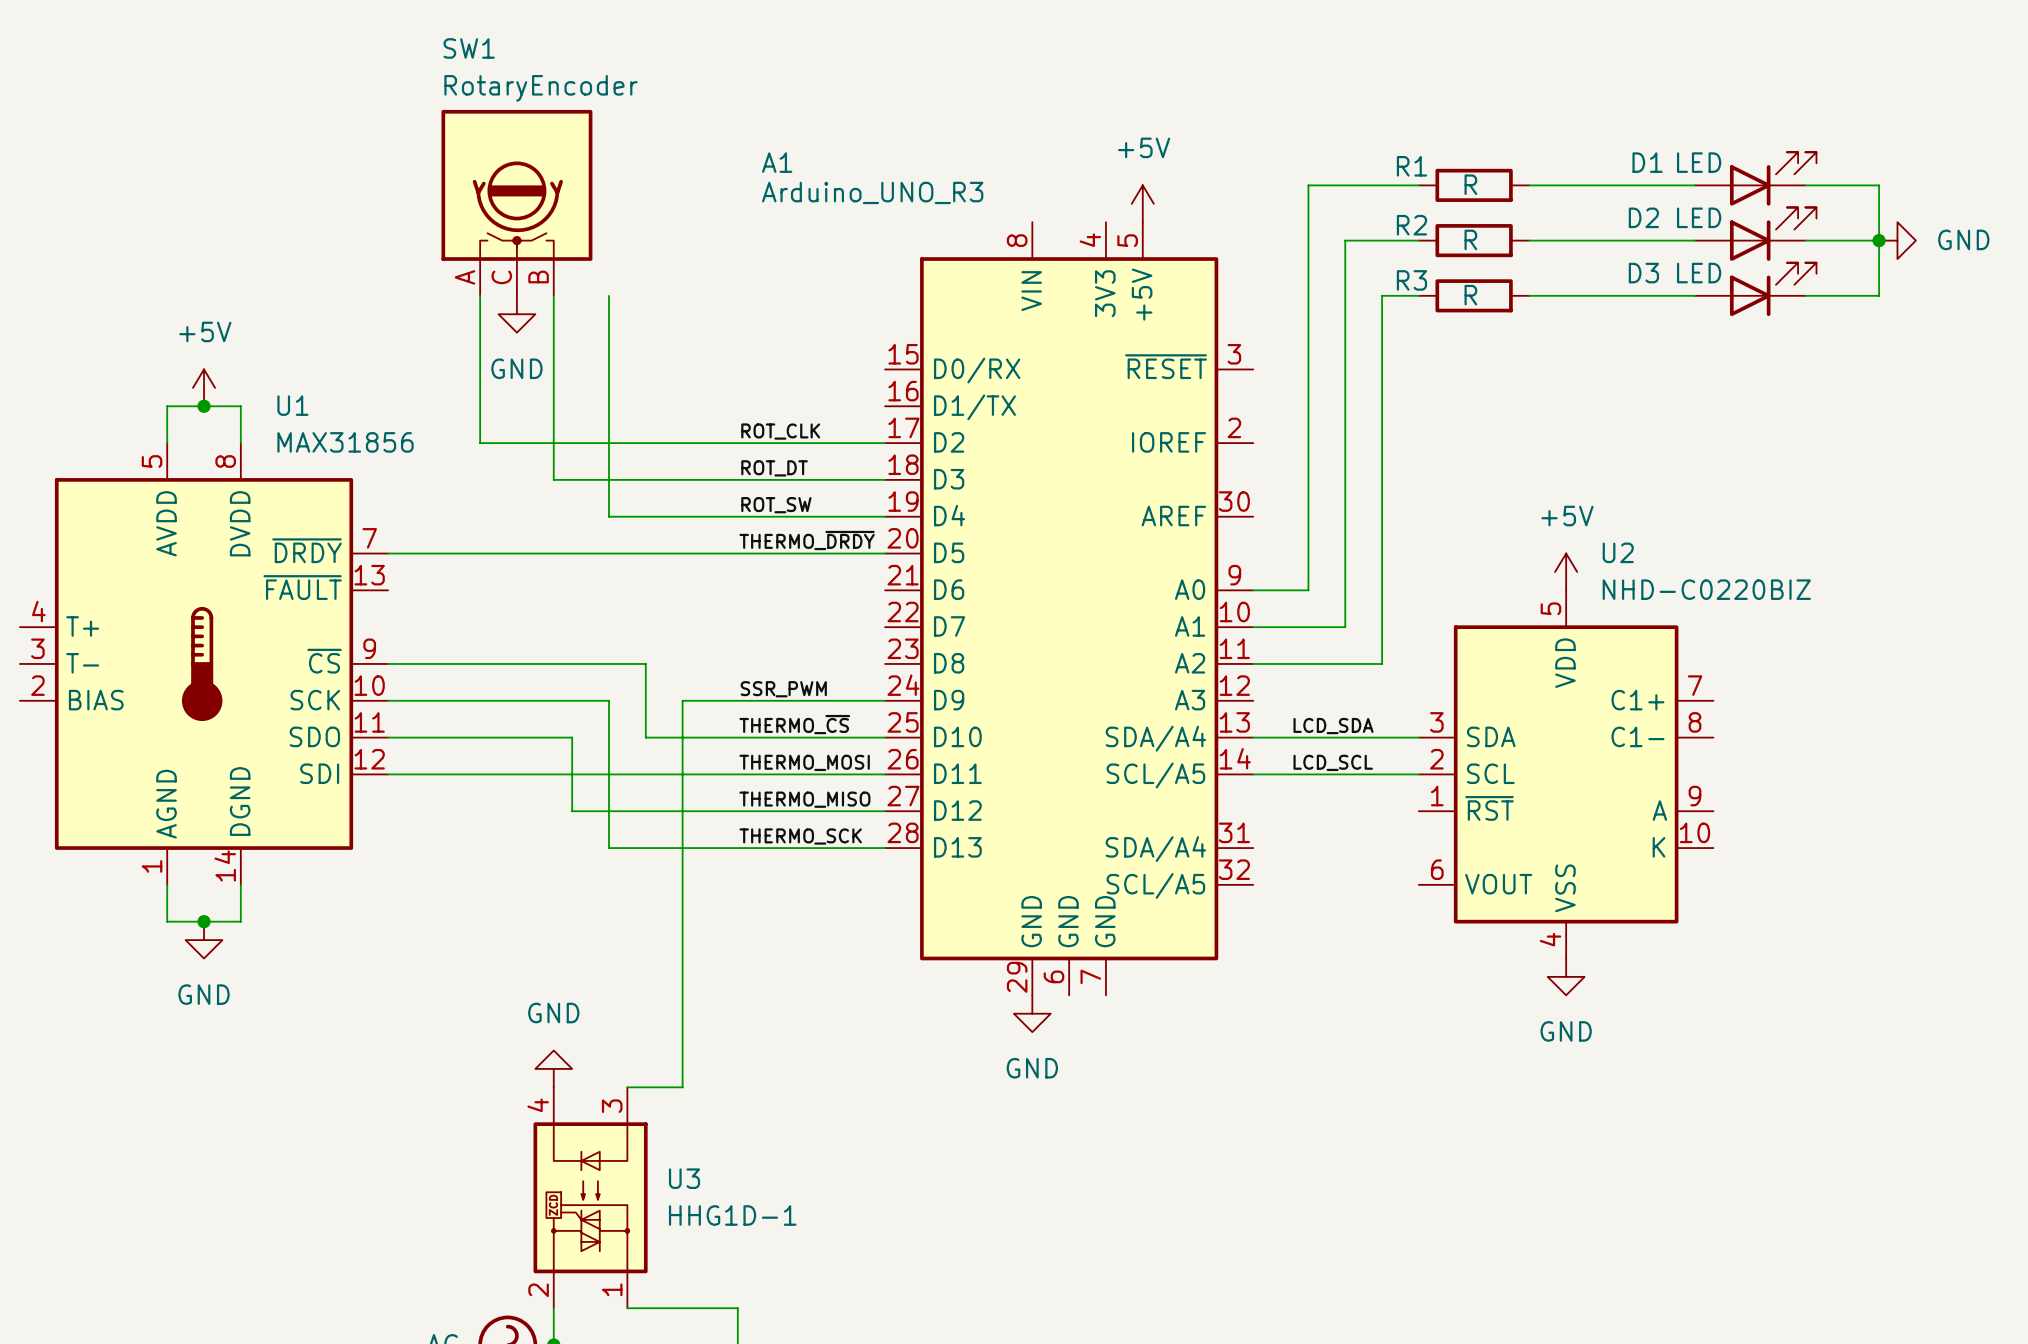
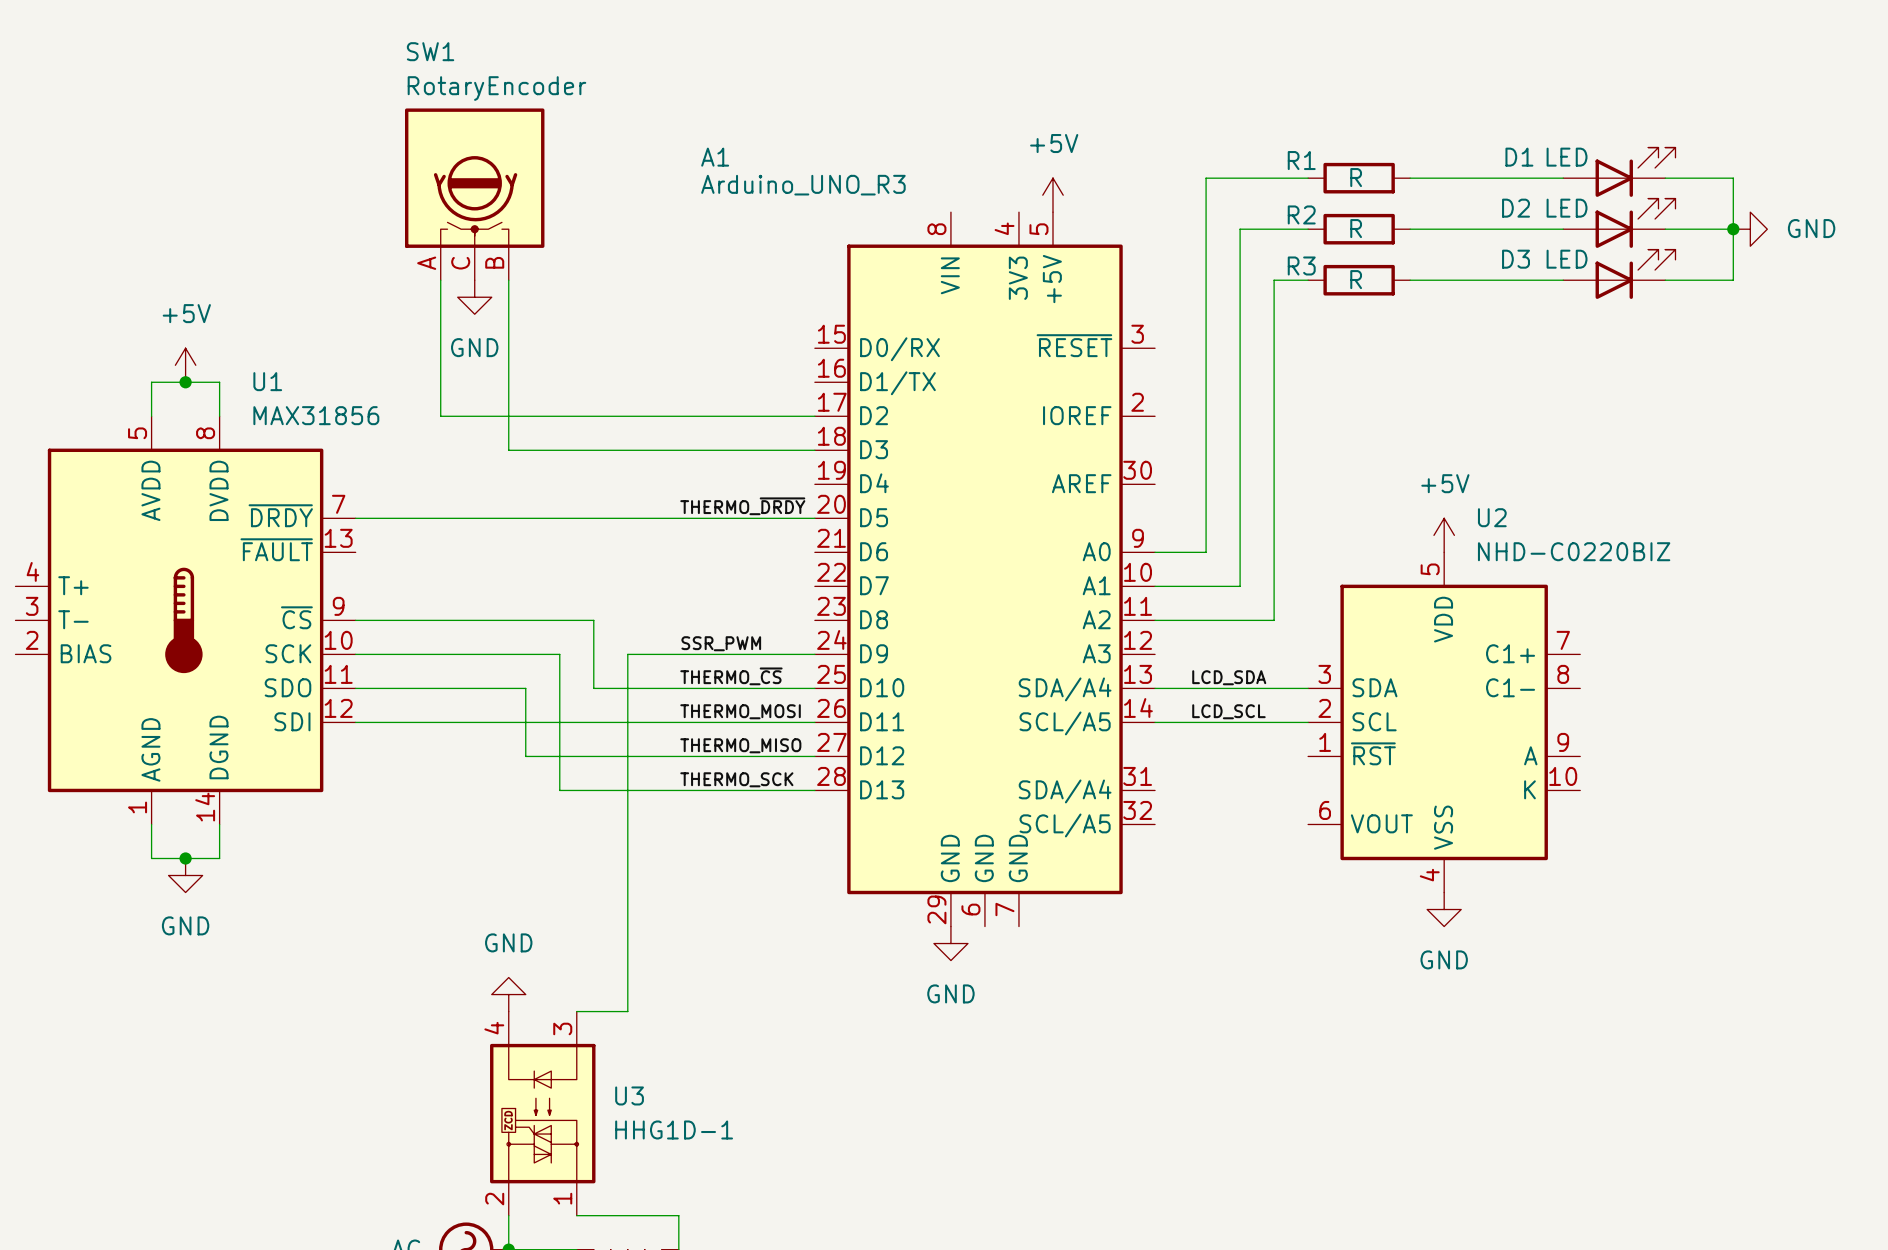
wire: (608, 295) (608, 516) (885, 516) -> none
label: ROT_CLK (780, 431) -> none
label: ROT_DT (774, 468) -> none
label: ROT_SW (776, 505) -> none

